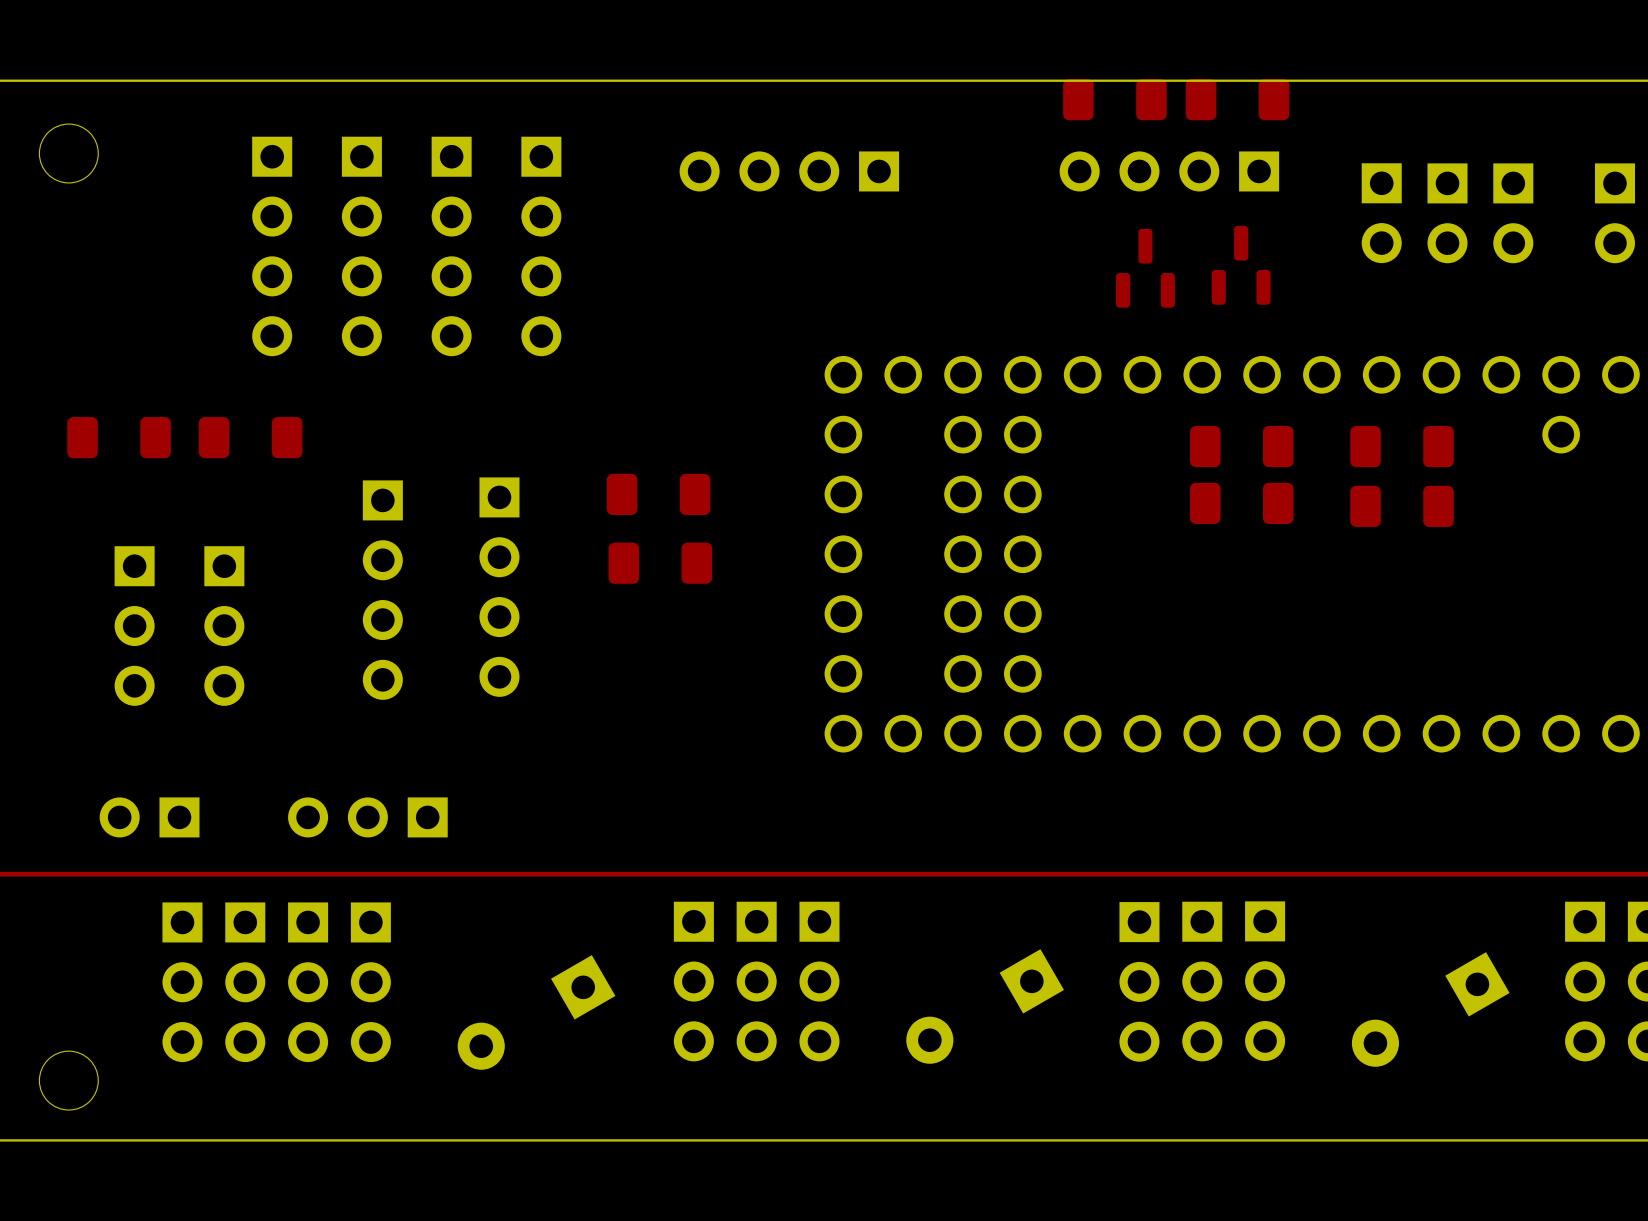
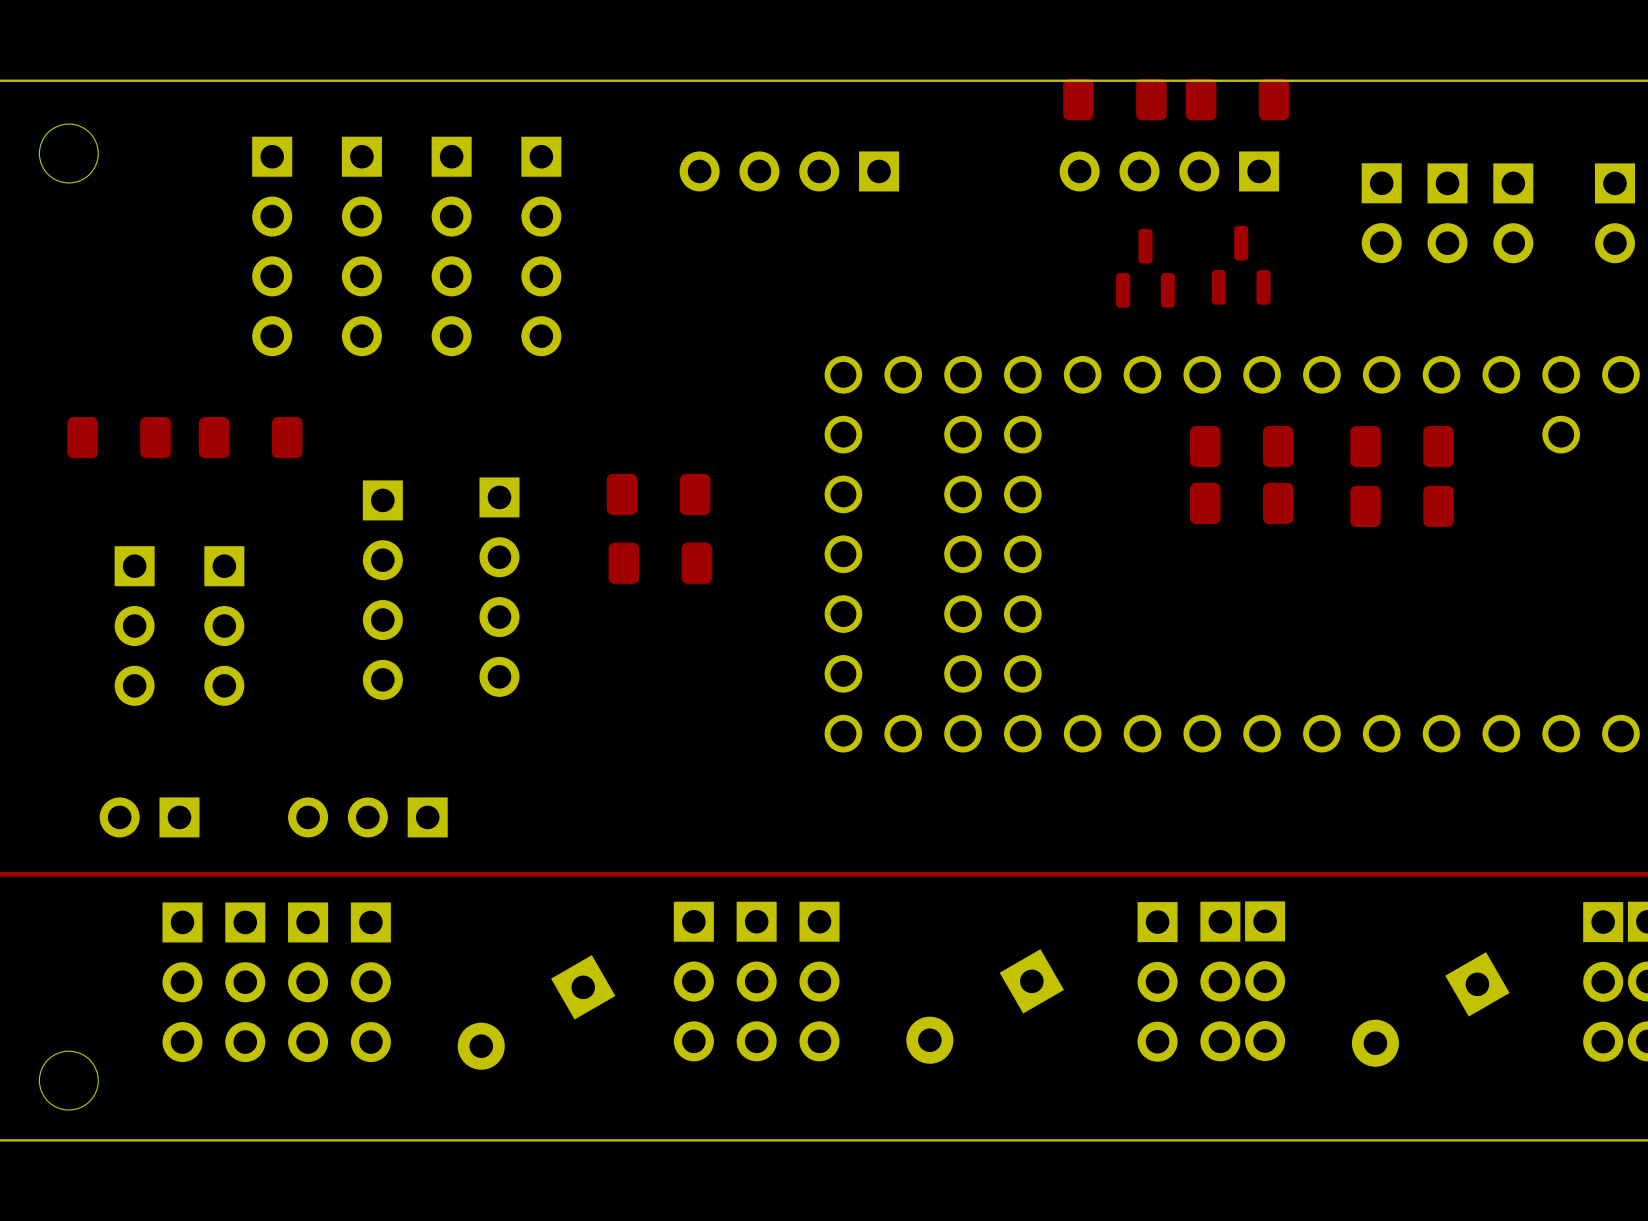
part position: (1139, 981) -> (1157, 981)
part position: (1202, 981) -> (1220, 981)
part position: (1585, 981) -> (1603, 981)

